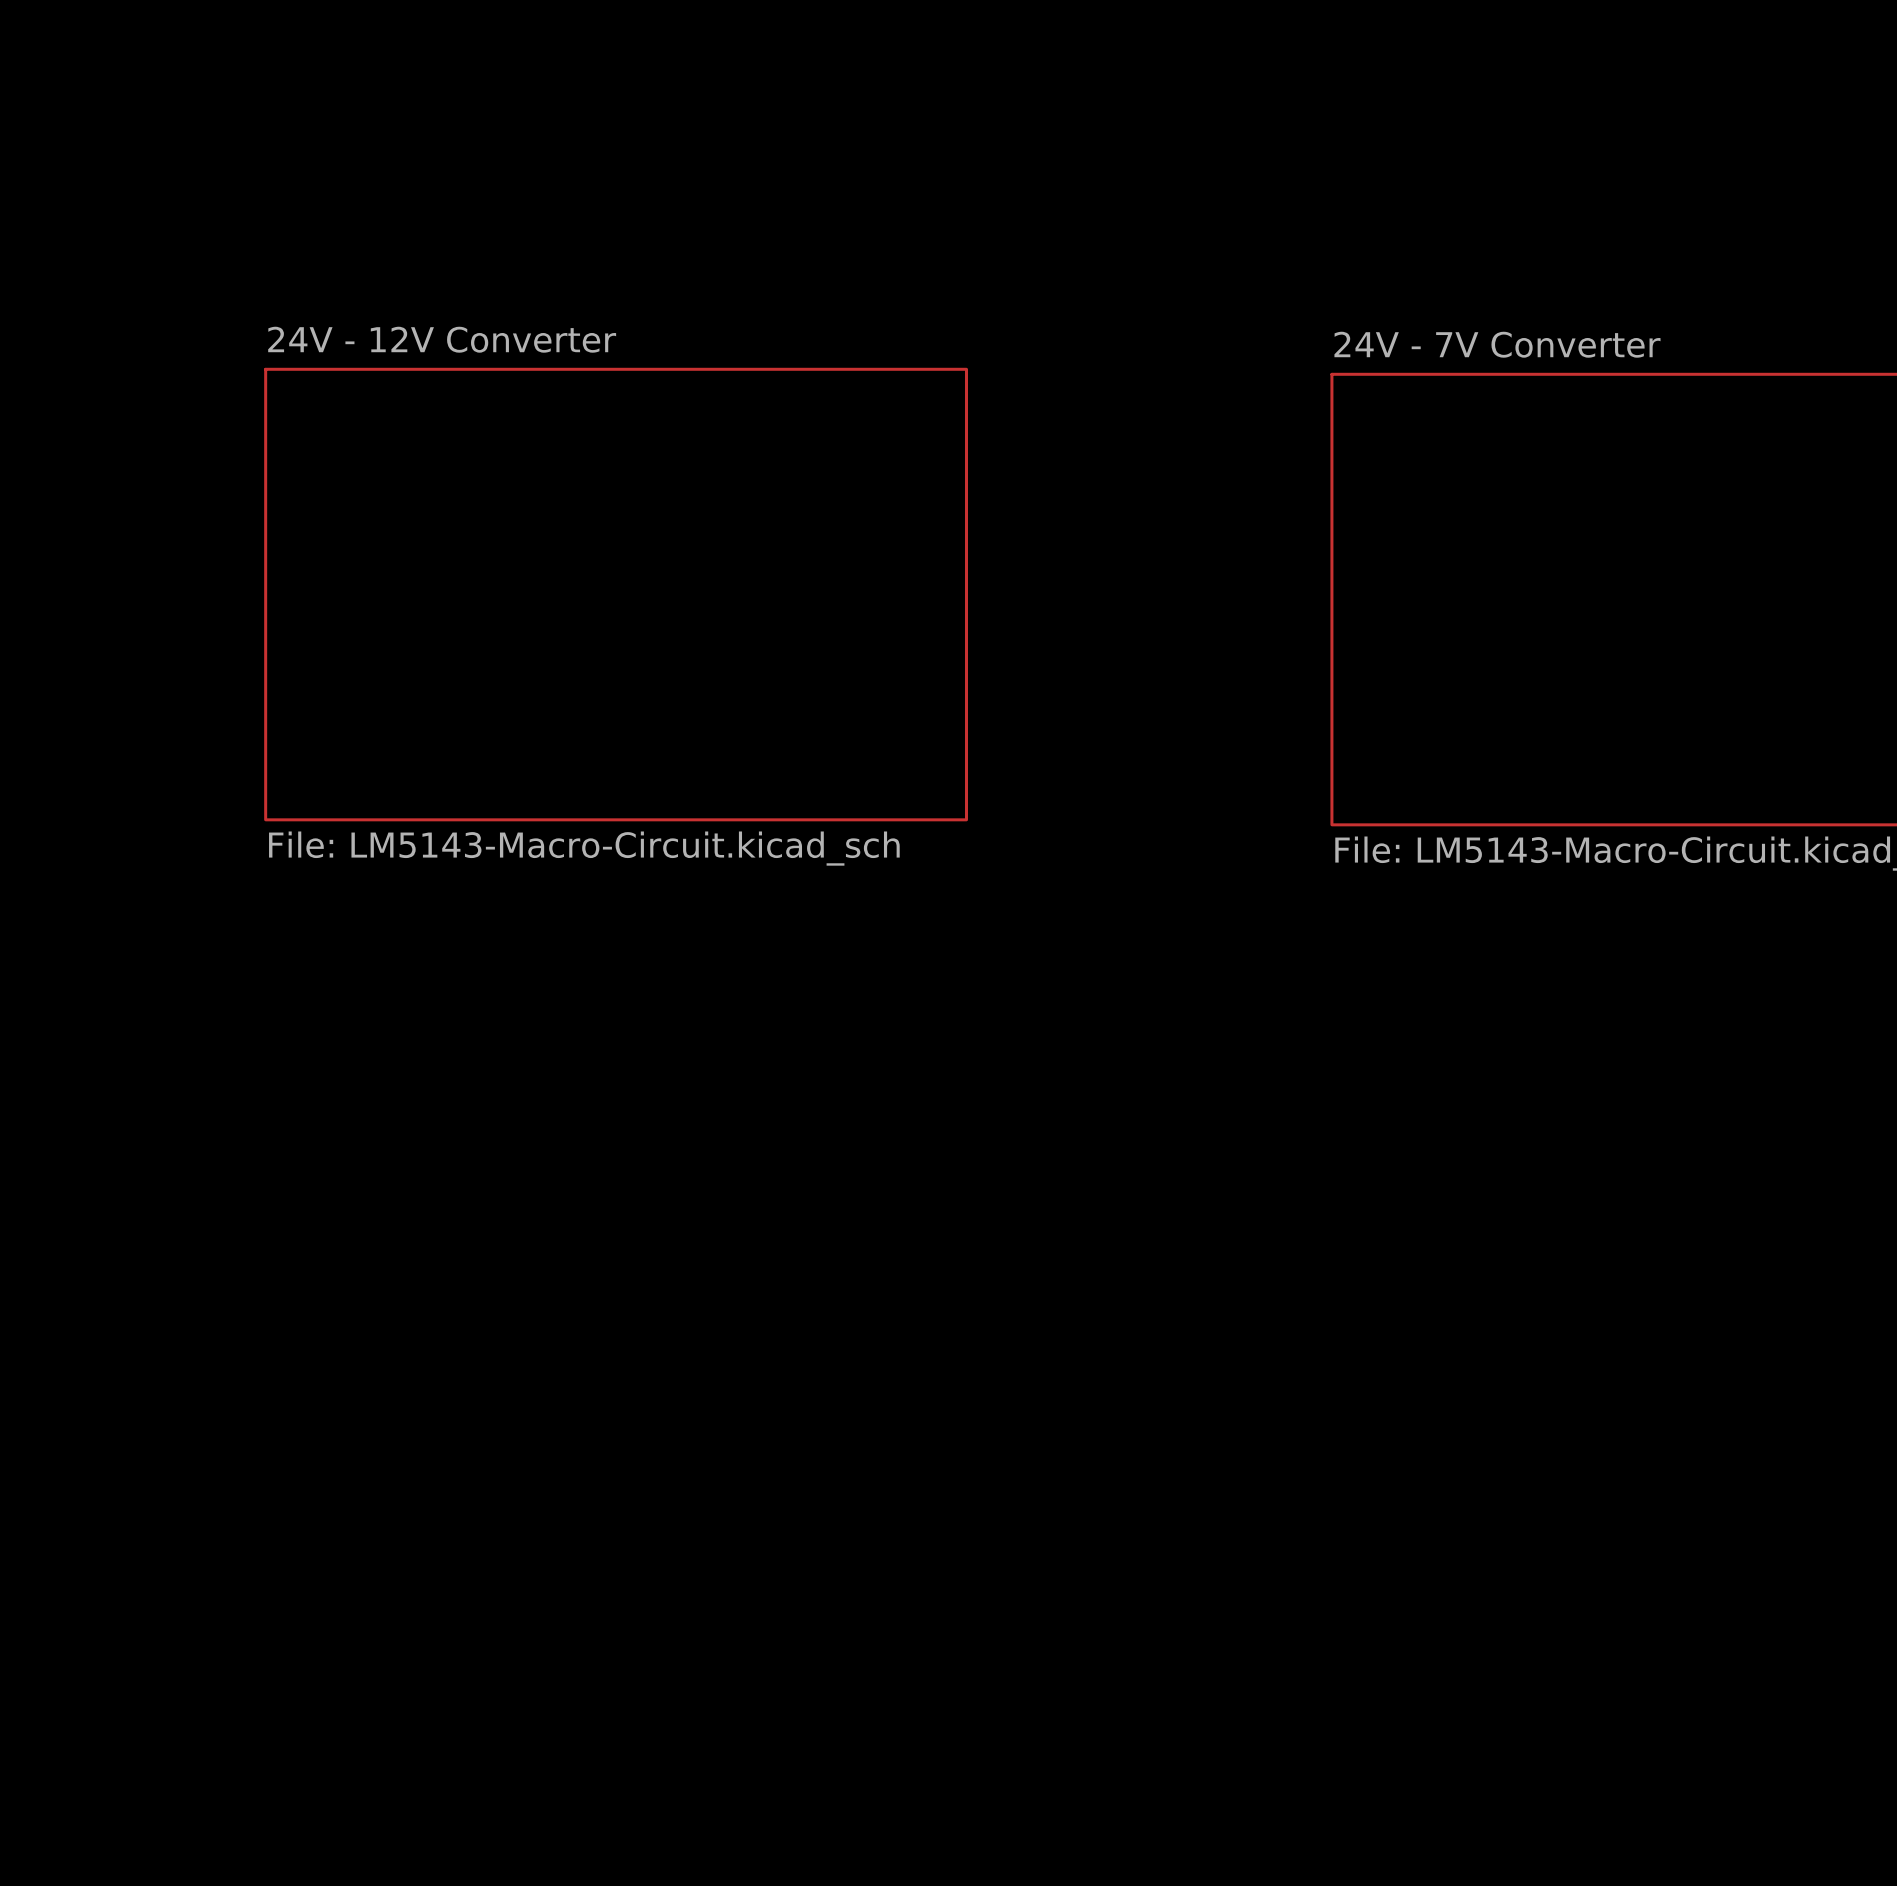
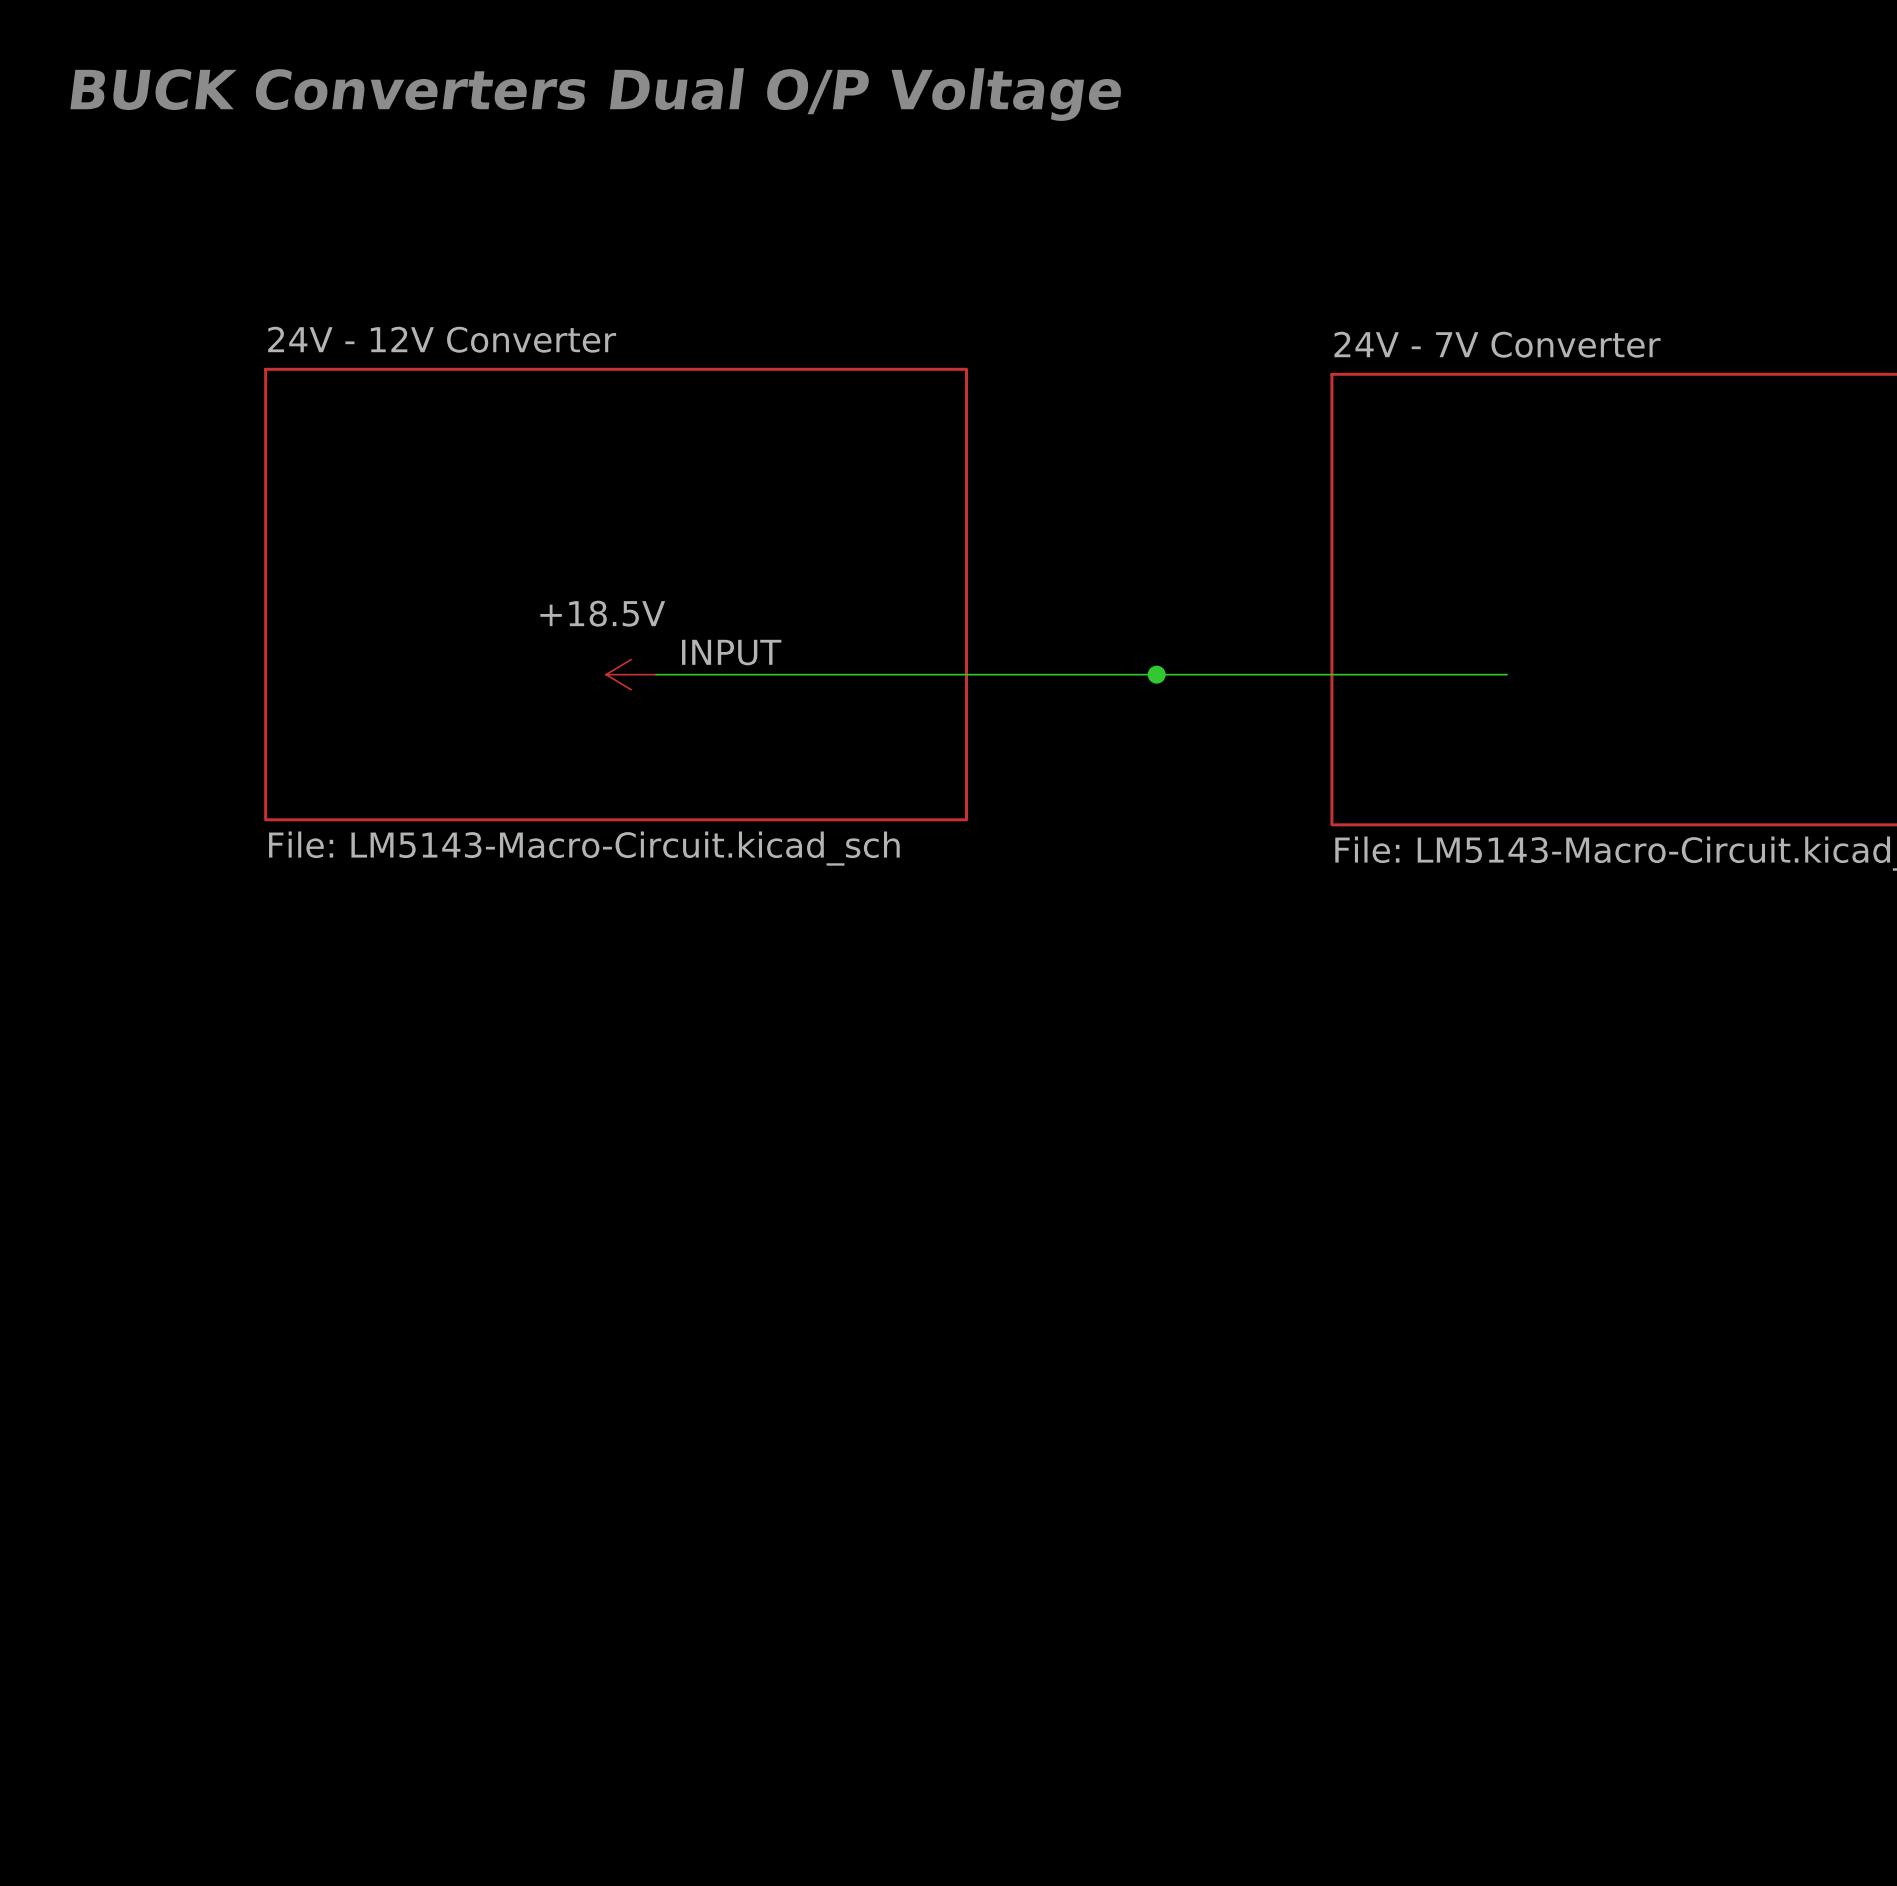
text: none -> BUCK Converters Dual O/P Voltage (596, 94)
label: none -> INPUT (731, 652)
power symbol: none -> +18.5V (631, 674)
wire: none -> (656, 674) (1507, 674)
junction: none -> (1156, 674)

